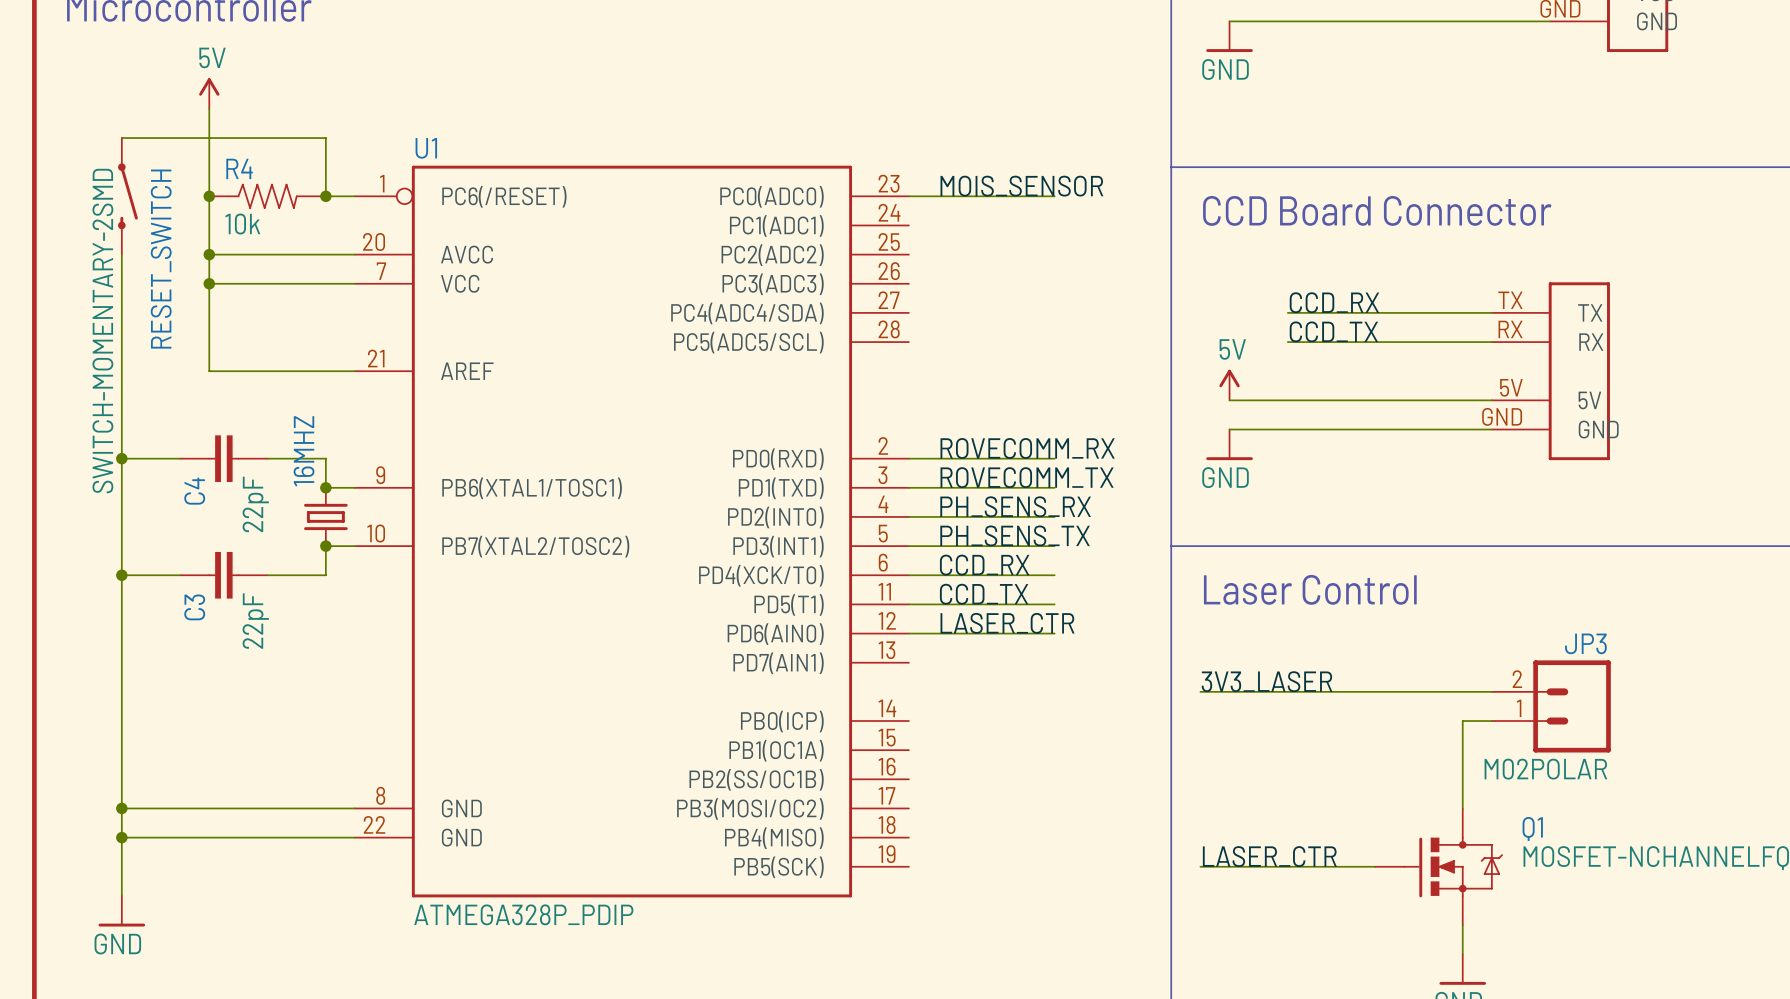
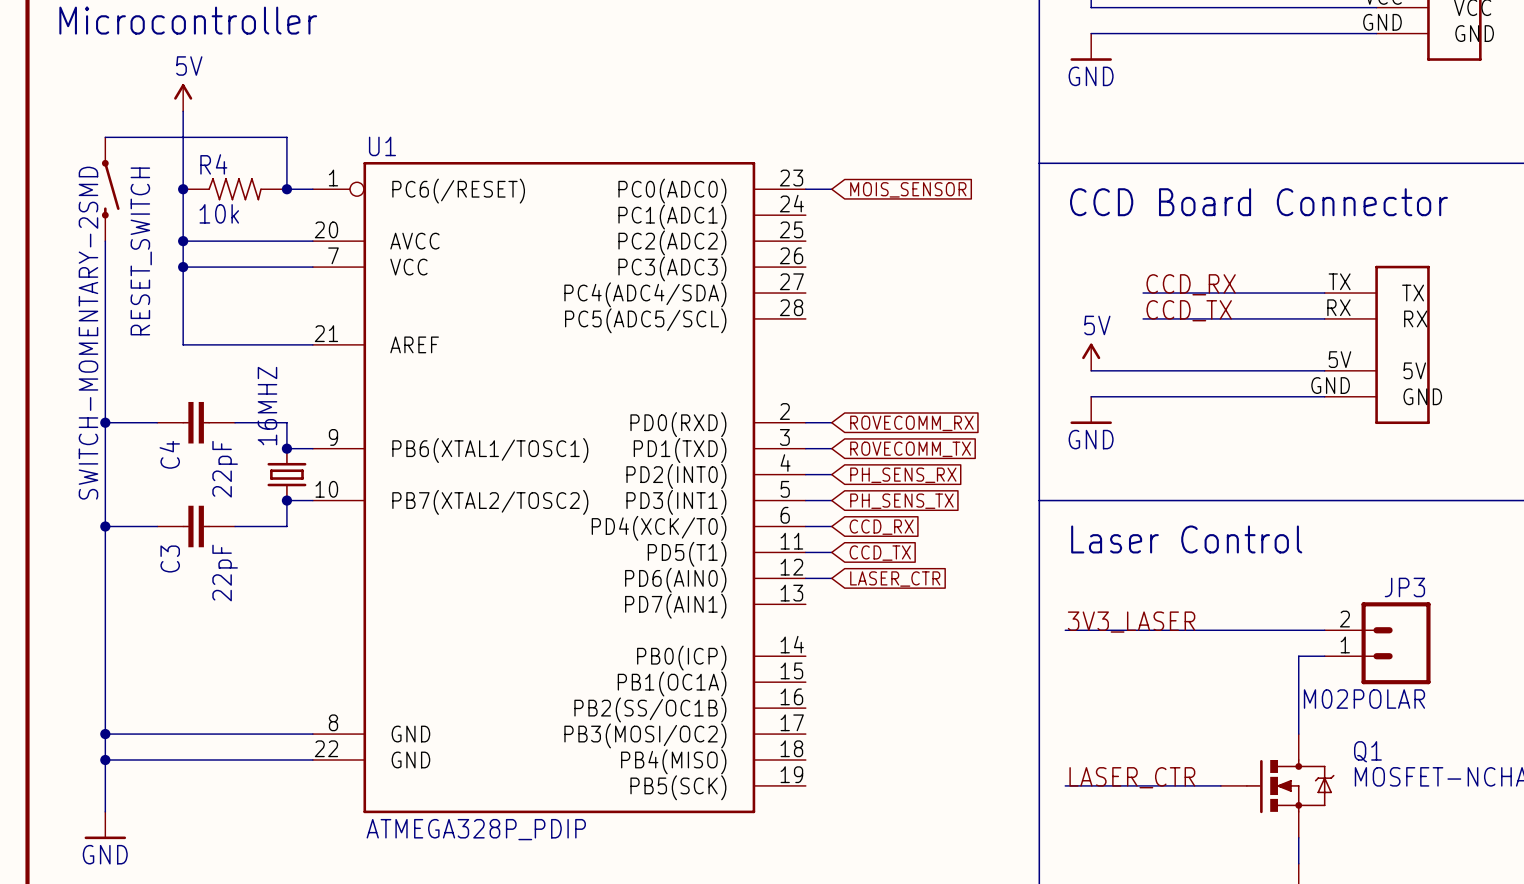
label: MOIS_SENSOR (1021, 186) -> none
wire: (938, 196) (1054, 196) -> none
global label: none -> MOIS_SENSOR (908, 189)
label: ROVECOMM_RX (1027, 448) -> none
wire: (938, 458) (1054, 458) -> none
global label: none -> ROVECOMM_RX (911, 423)
label: ROVECOMM_TX (1027, 477) -> none
wire: (938, 487) (1054, 487) -> none
global label: none -> ROVECOMM_TX (910, 449)
label: PH_SENS_RX (1015, 506) -> none
wire: (938, 516) (1054, 516) -> none
global label: none -> PH_SENS_RX (903, 475)
label: PH_SENS_TX (1015, 535) -> none
wire: (938, 546) (1054, 546) -> none
global label: none -> PH_SENS_TX (901, 501)
label: CCD_RX (984, 565) -> none
wire: (938, 575) (1054, 575) -> none
global label: none -> CCD_RX (881, 527)
label: CCD_TX (984, 594) -> none
wire: (938, 604) (1054, 604) -> none
global label: none -> CCD_TX (880, 553)
label: LASER_CTR (1007, 623) -> none
wire: (938, 633) (1054, 633) -> none
global label: none -> LASER_CTR (895, 579)

